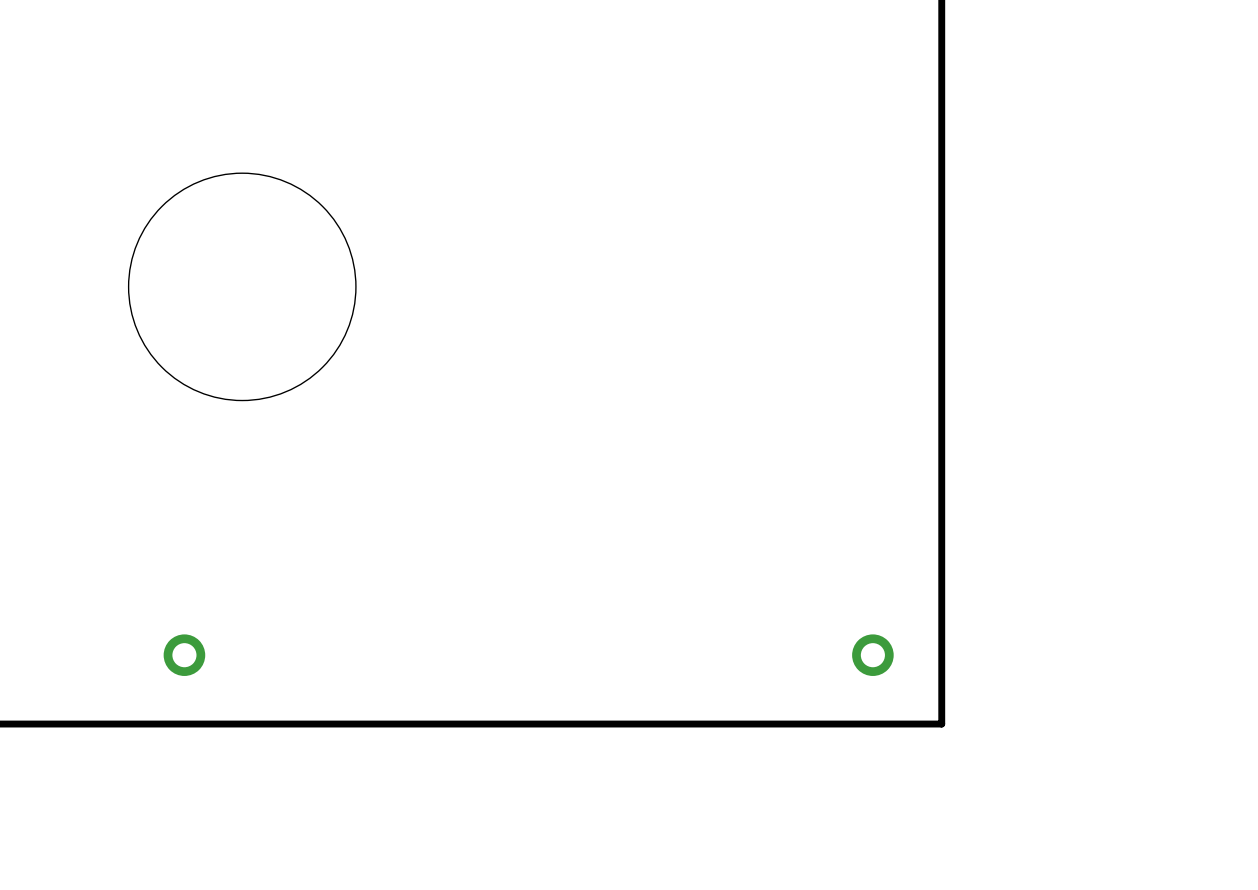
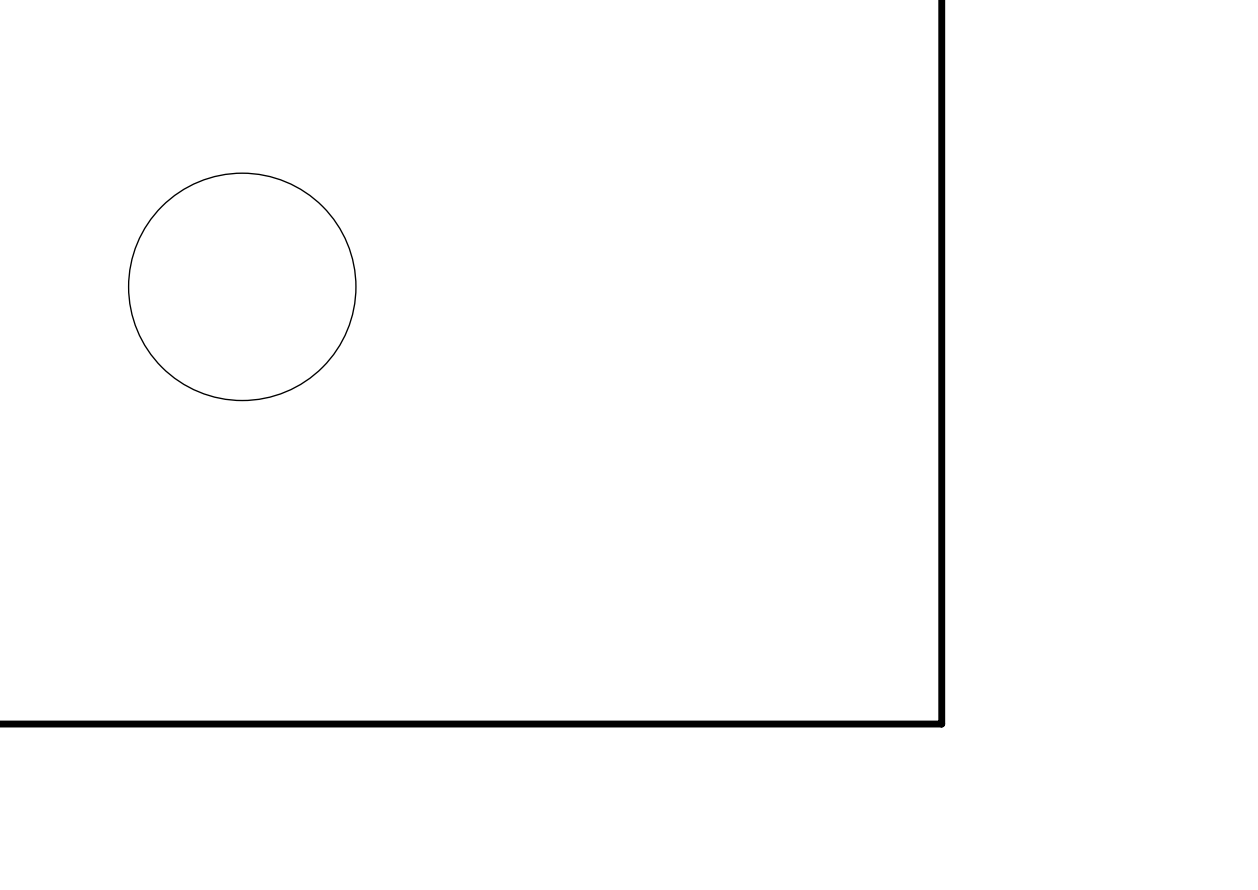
via: (184, 655) -> none
via: (872, 655) -> none

